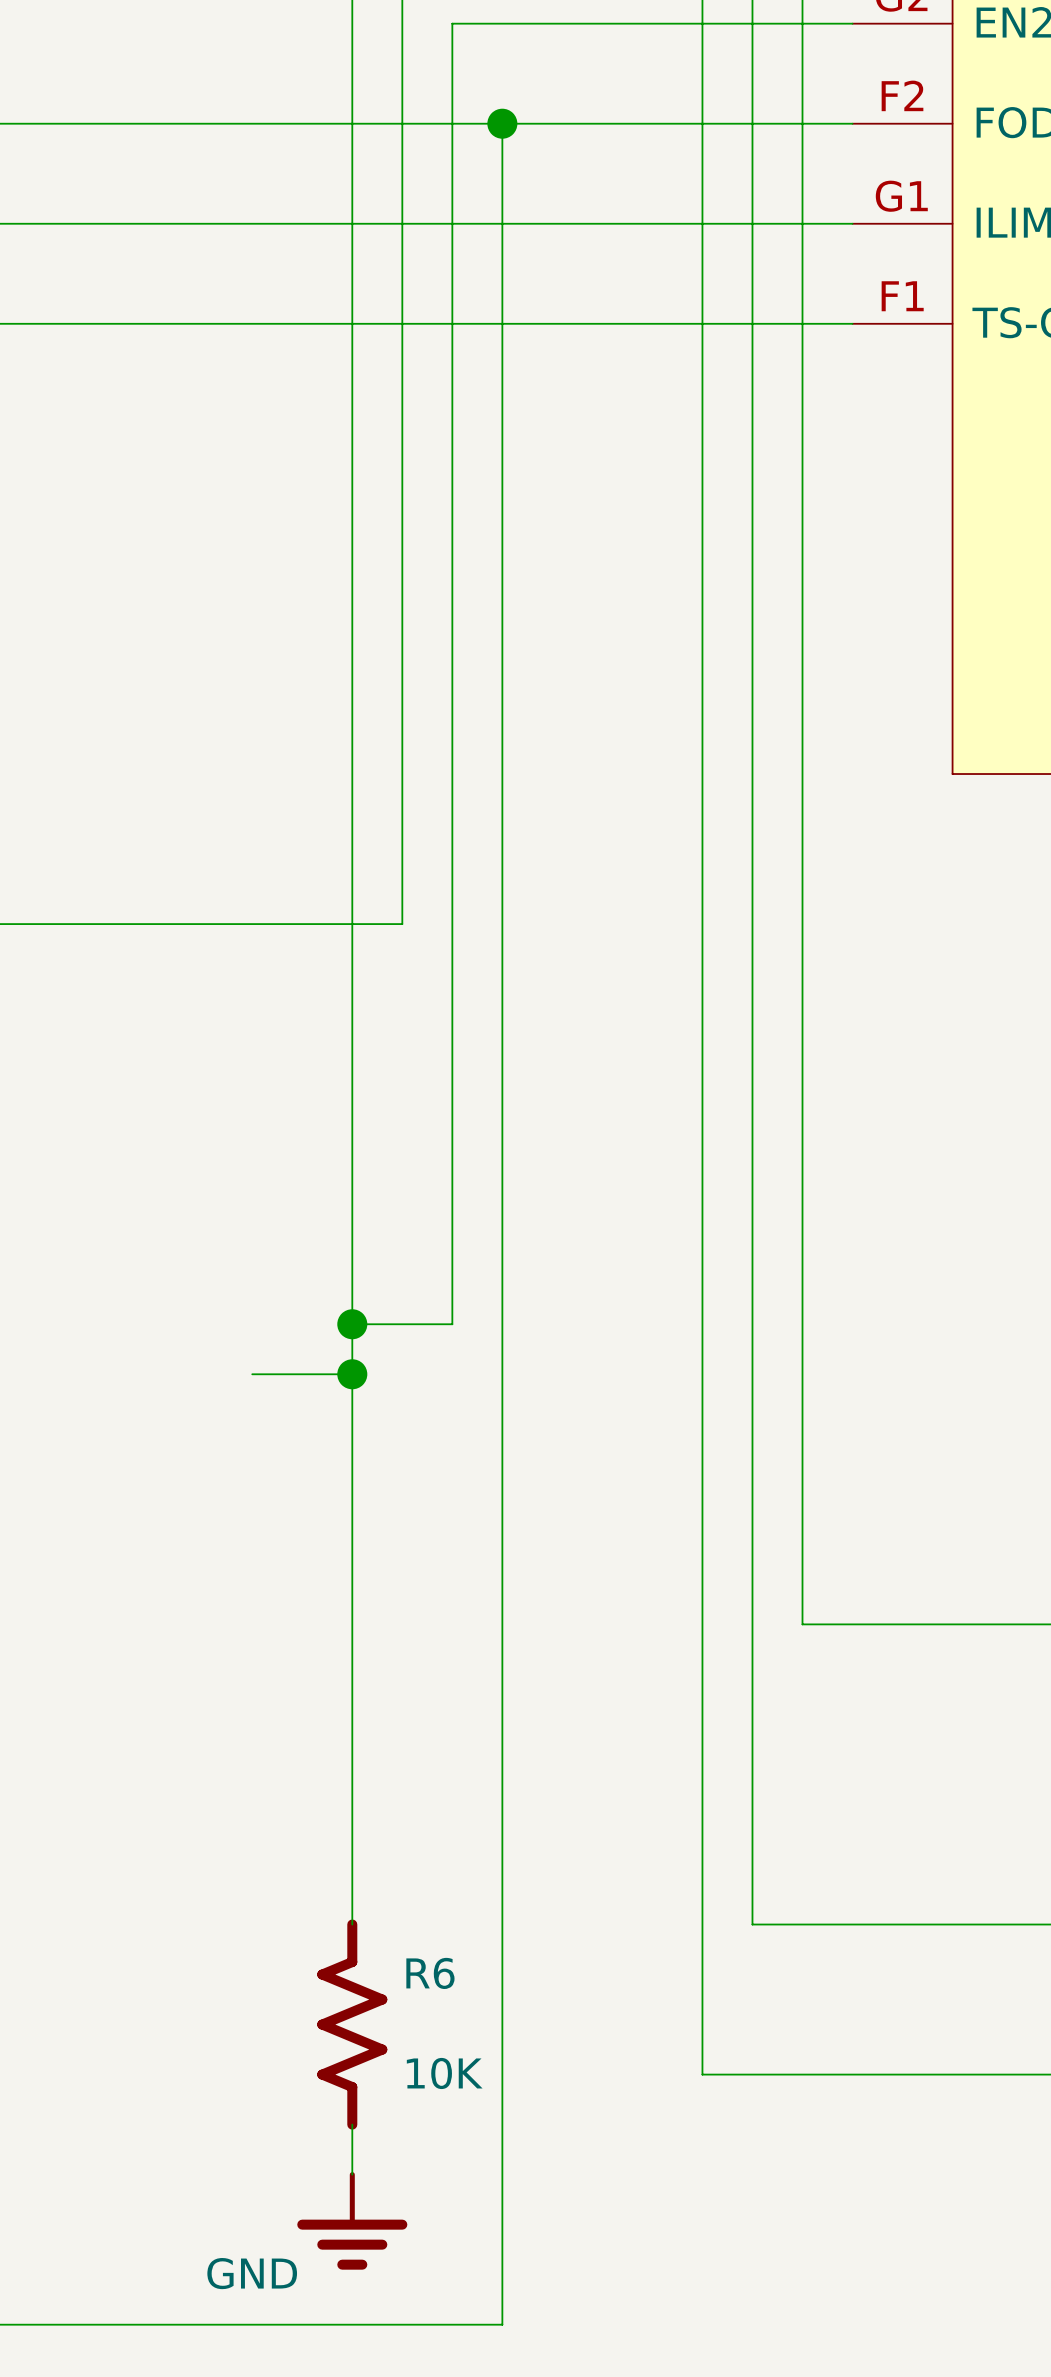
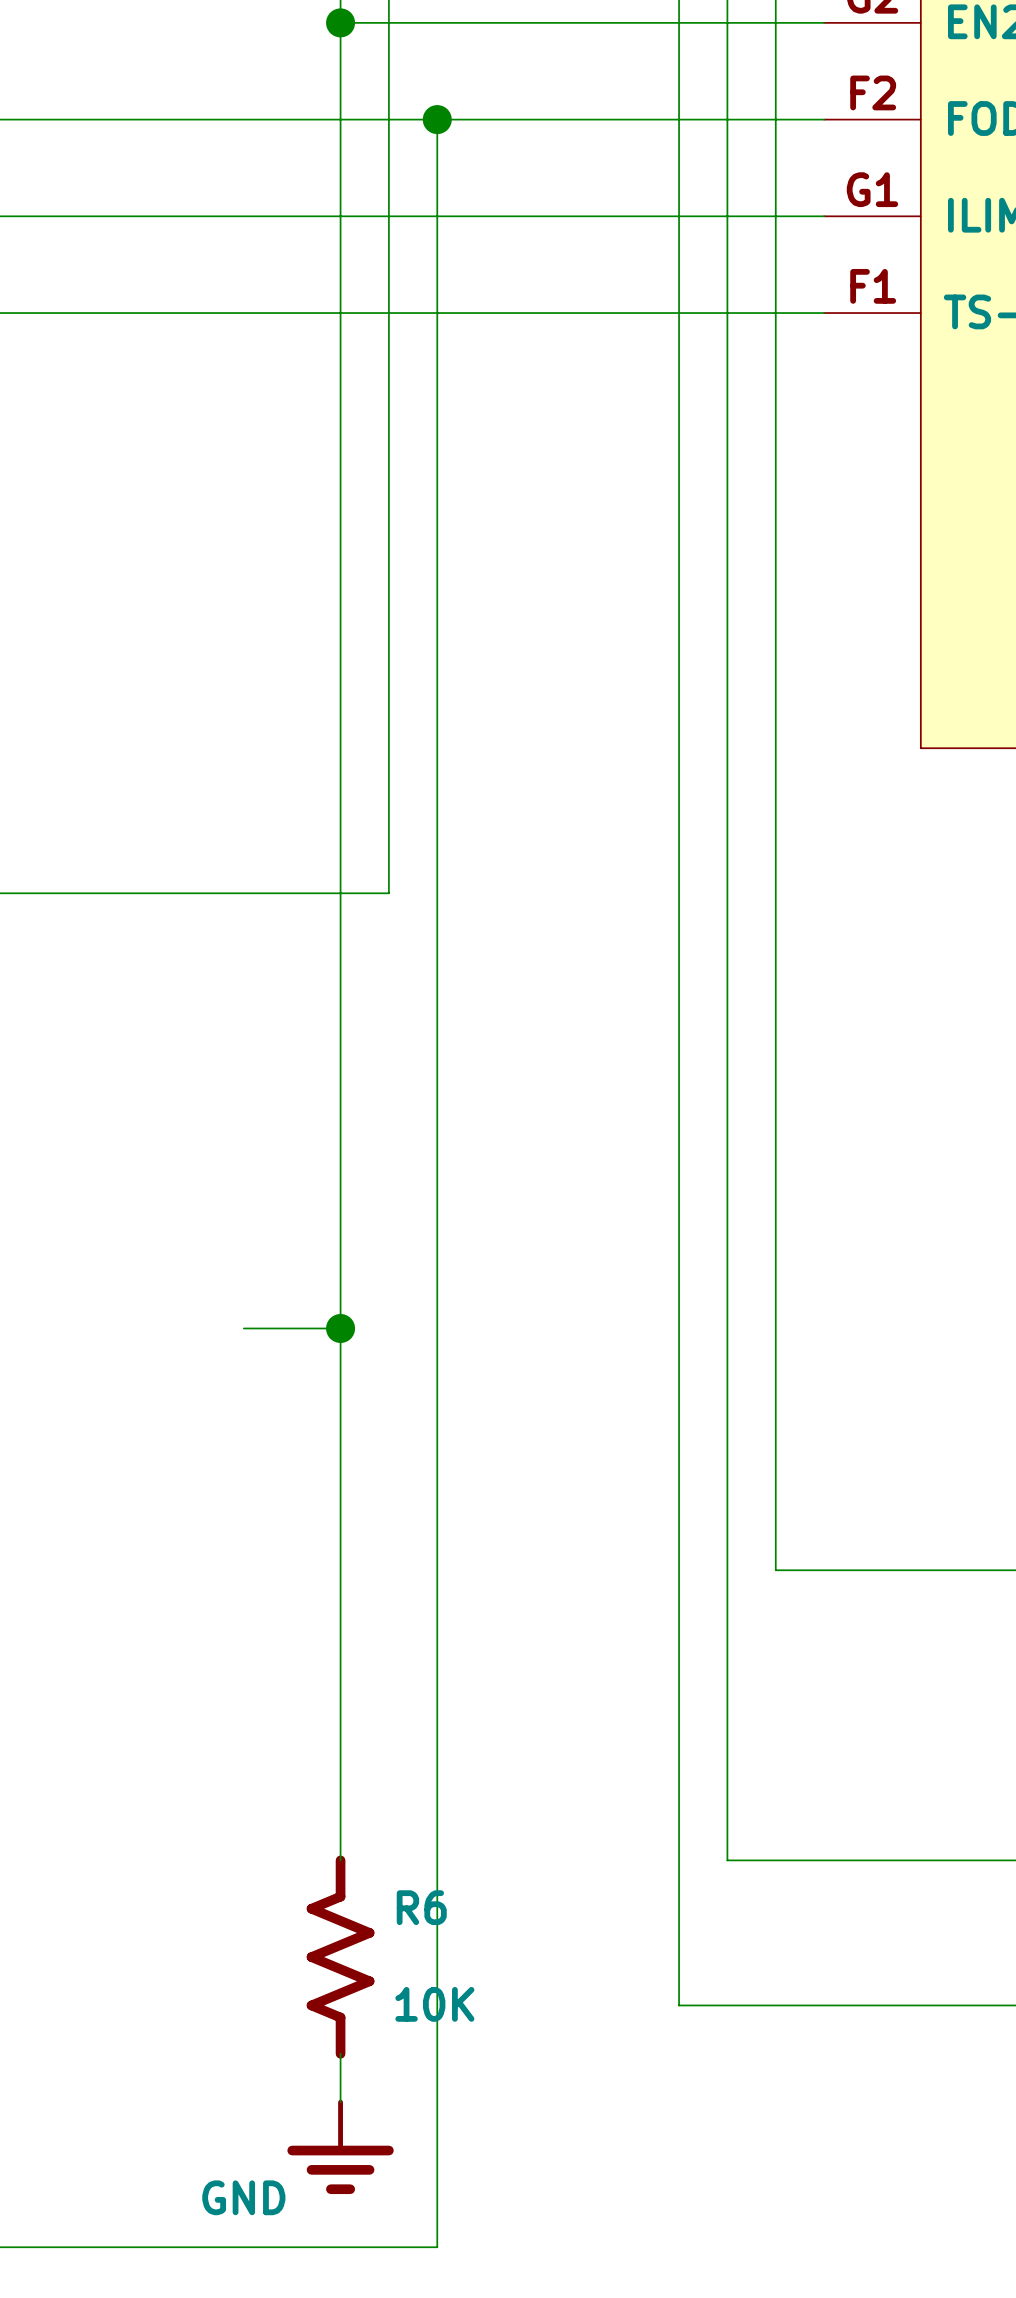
junction: none -> (340, 22)
wire: (452, 23) (452, 123) -> (437, 22) (340, 22)
wire: (502, 123) (502, 2324) (452, 2324) -> none
junction position: (502, 123) -> (437, 119)
wire: (352, 1324) (452, 1324) -> (437, 2247) (437, 1280)
junction: (352, 1324) -> none

